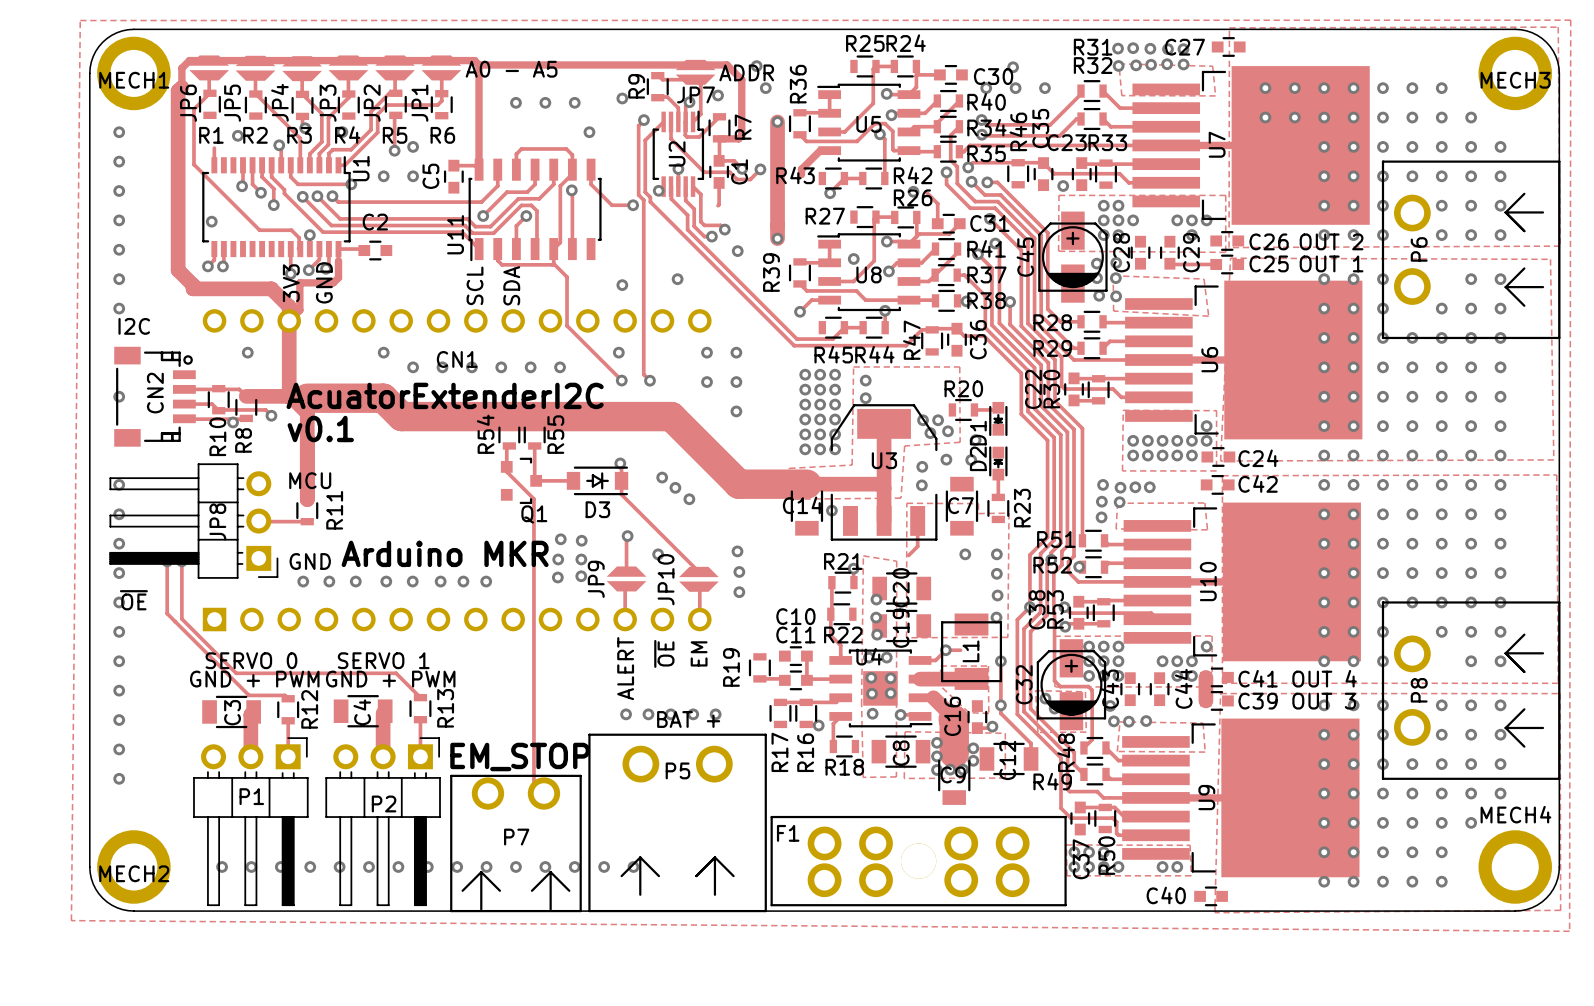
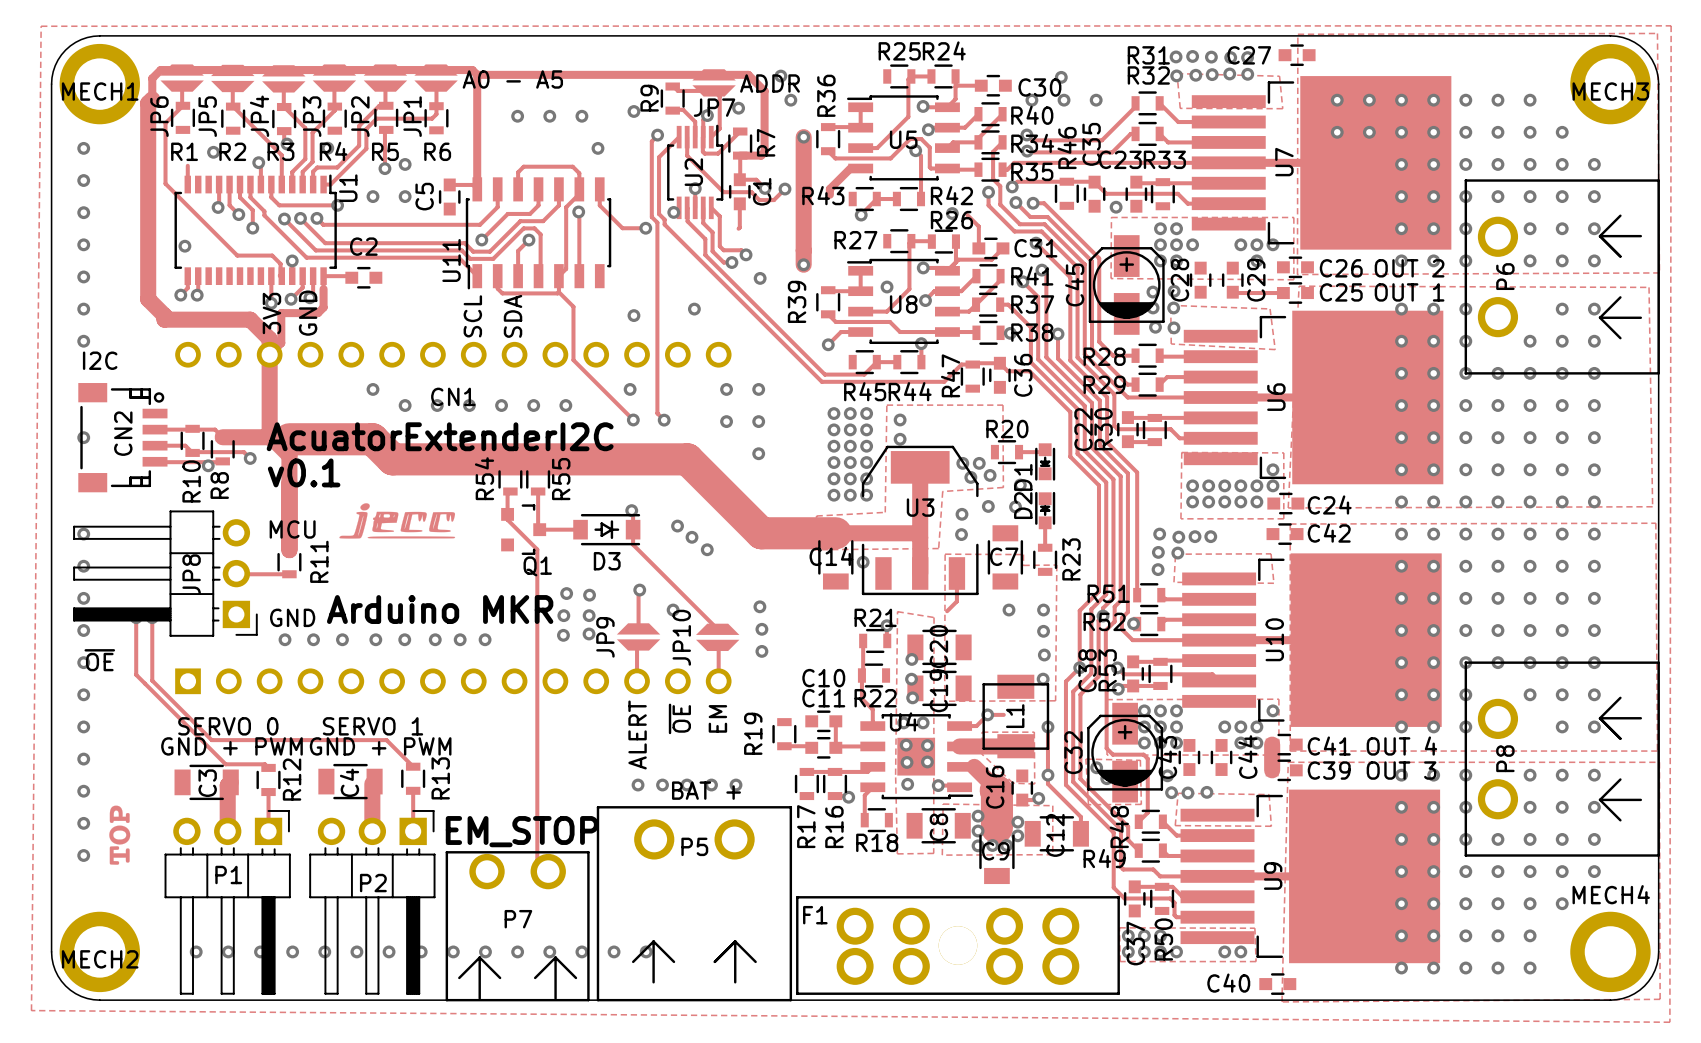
via: (247, 352) -> none
drawing: none -> [339, 503, 456, 539]
drawing: none -> [109, 805, 131, 865]

